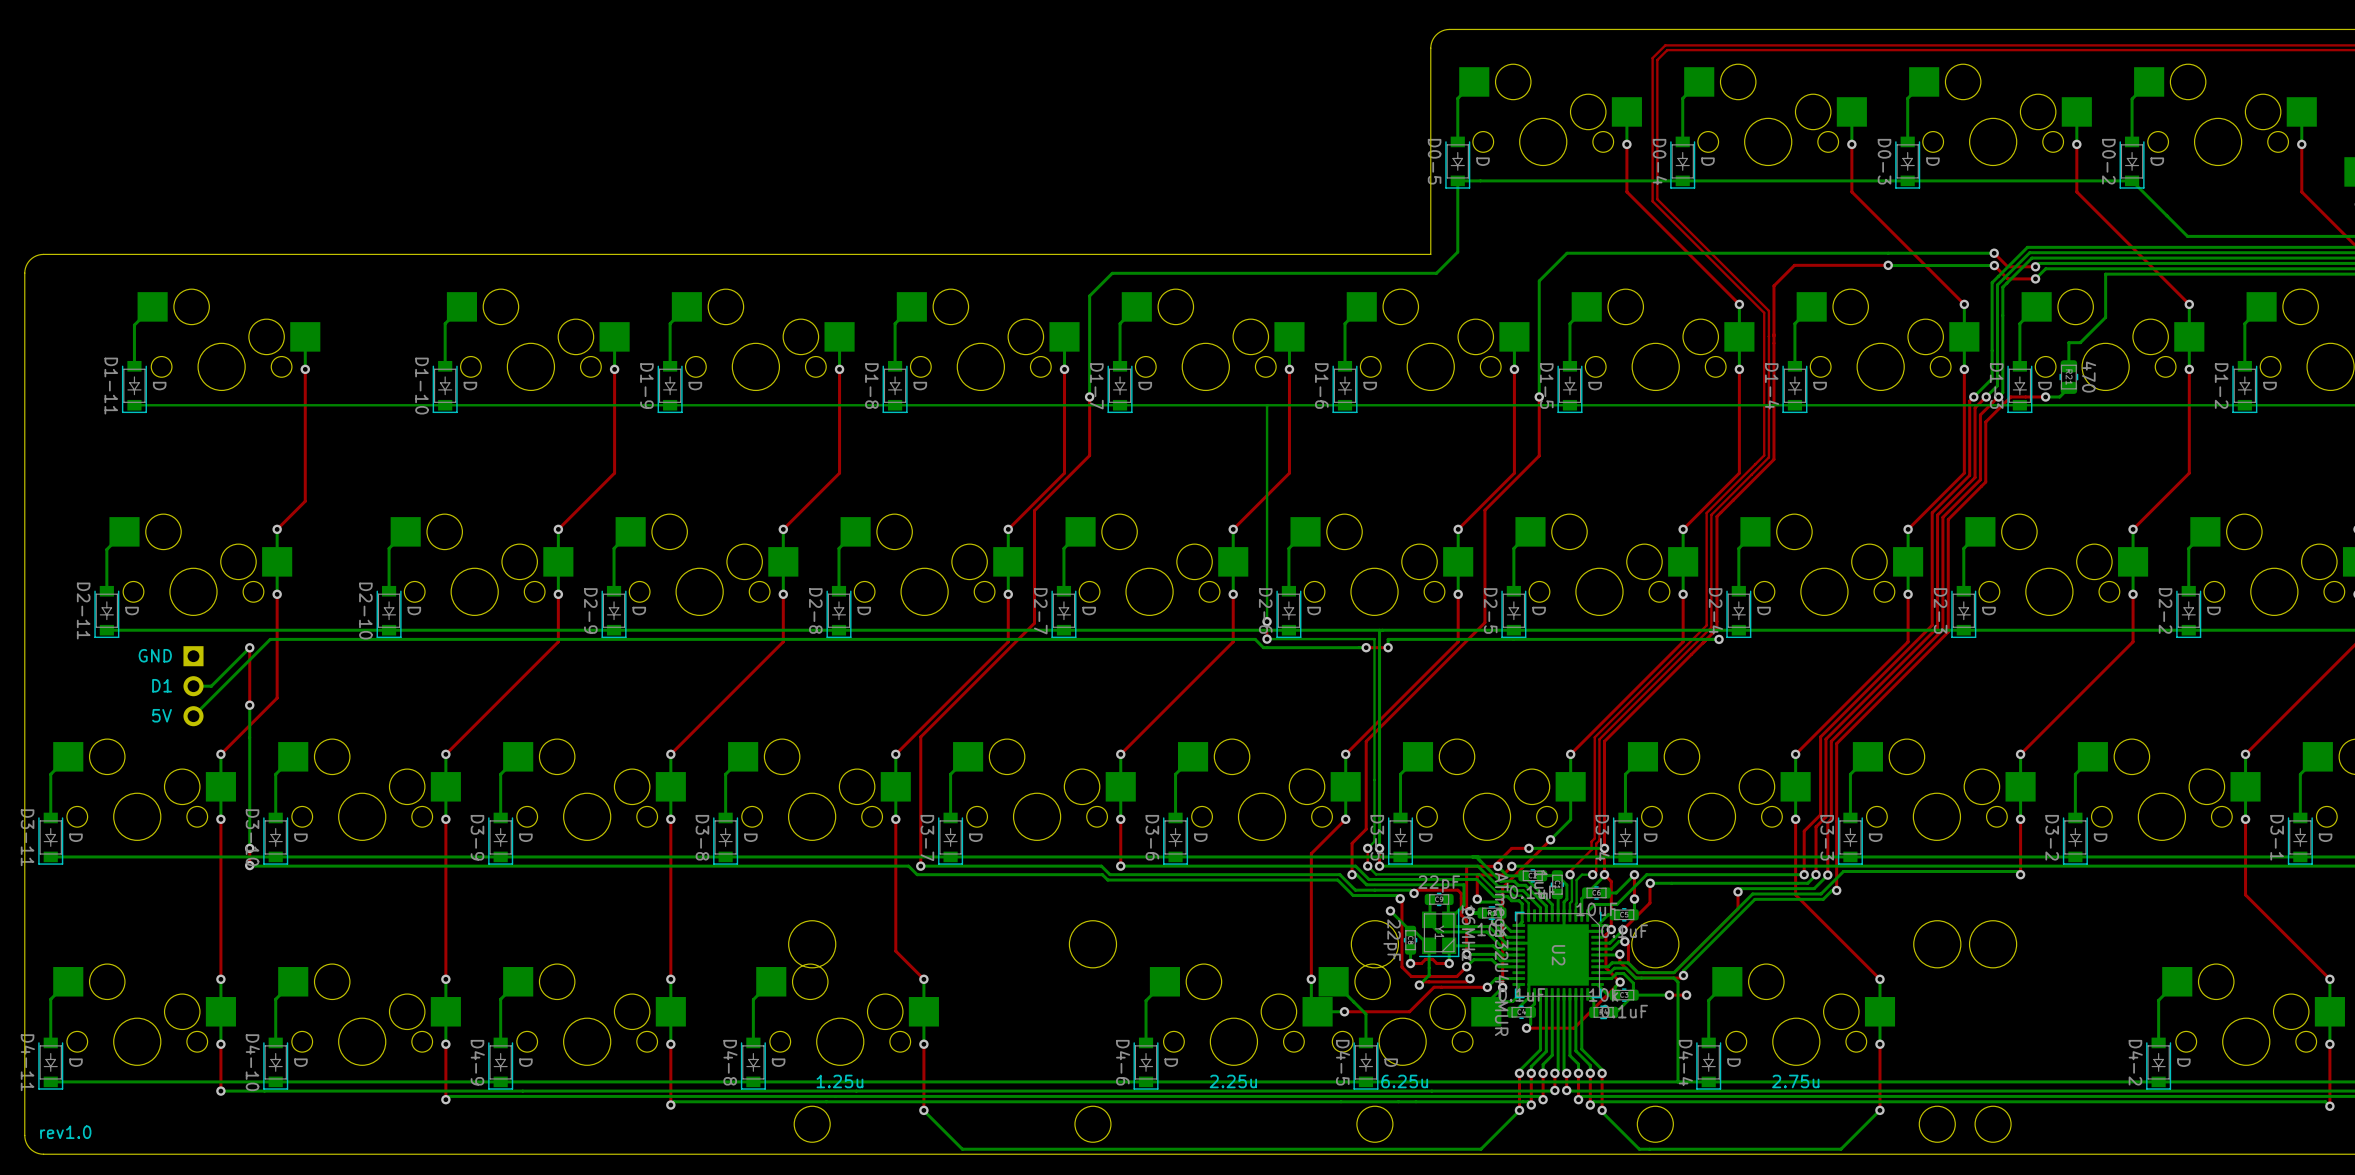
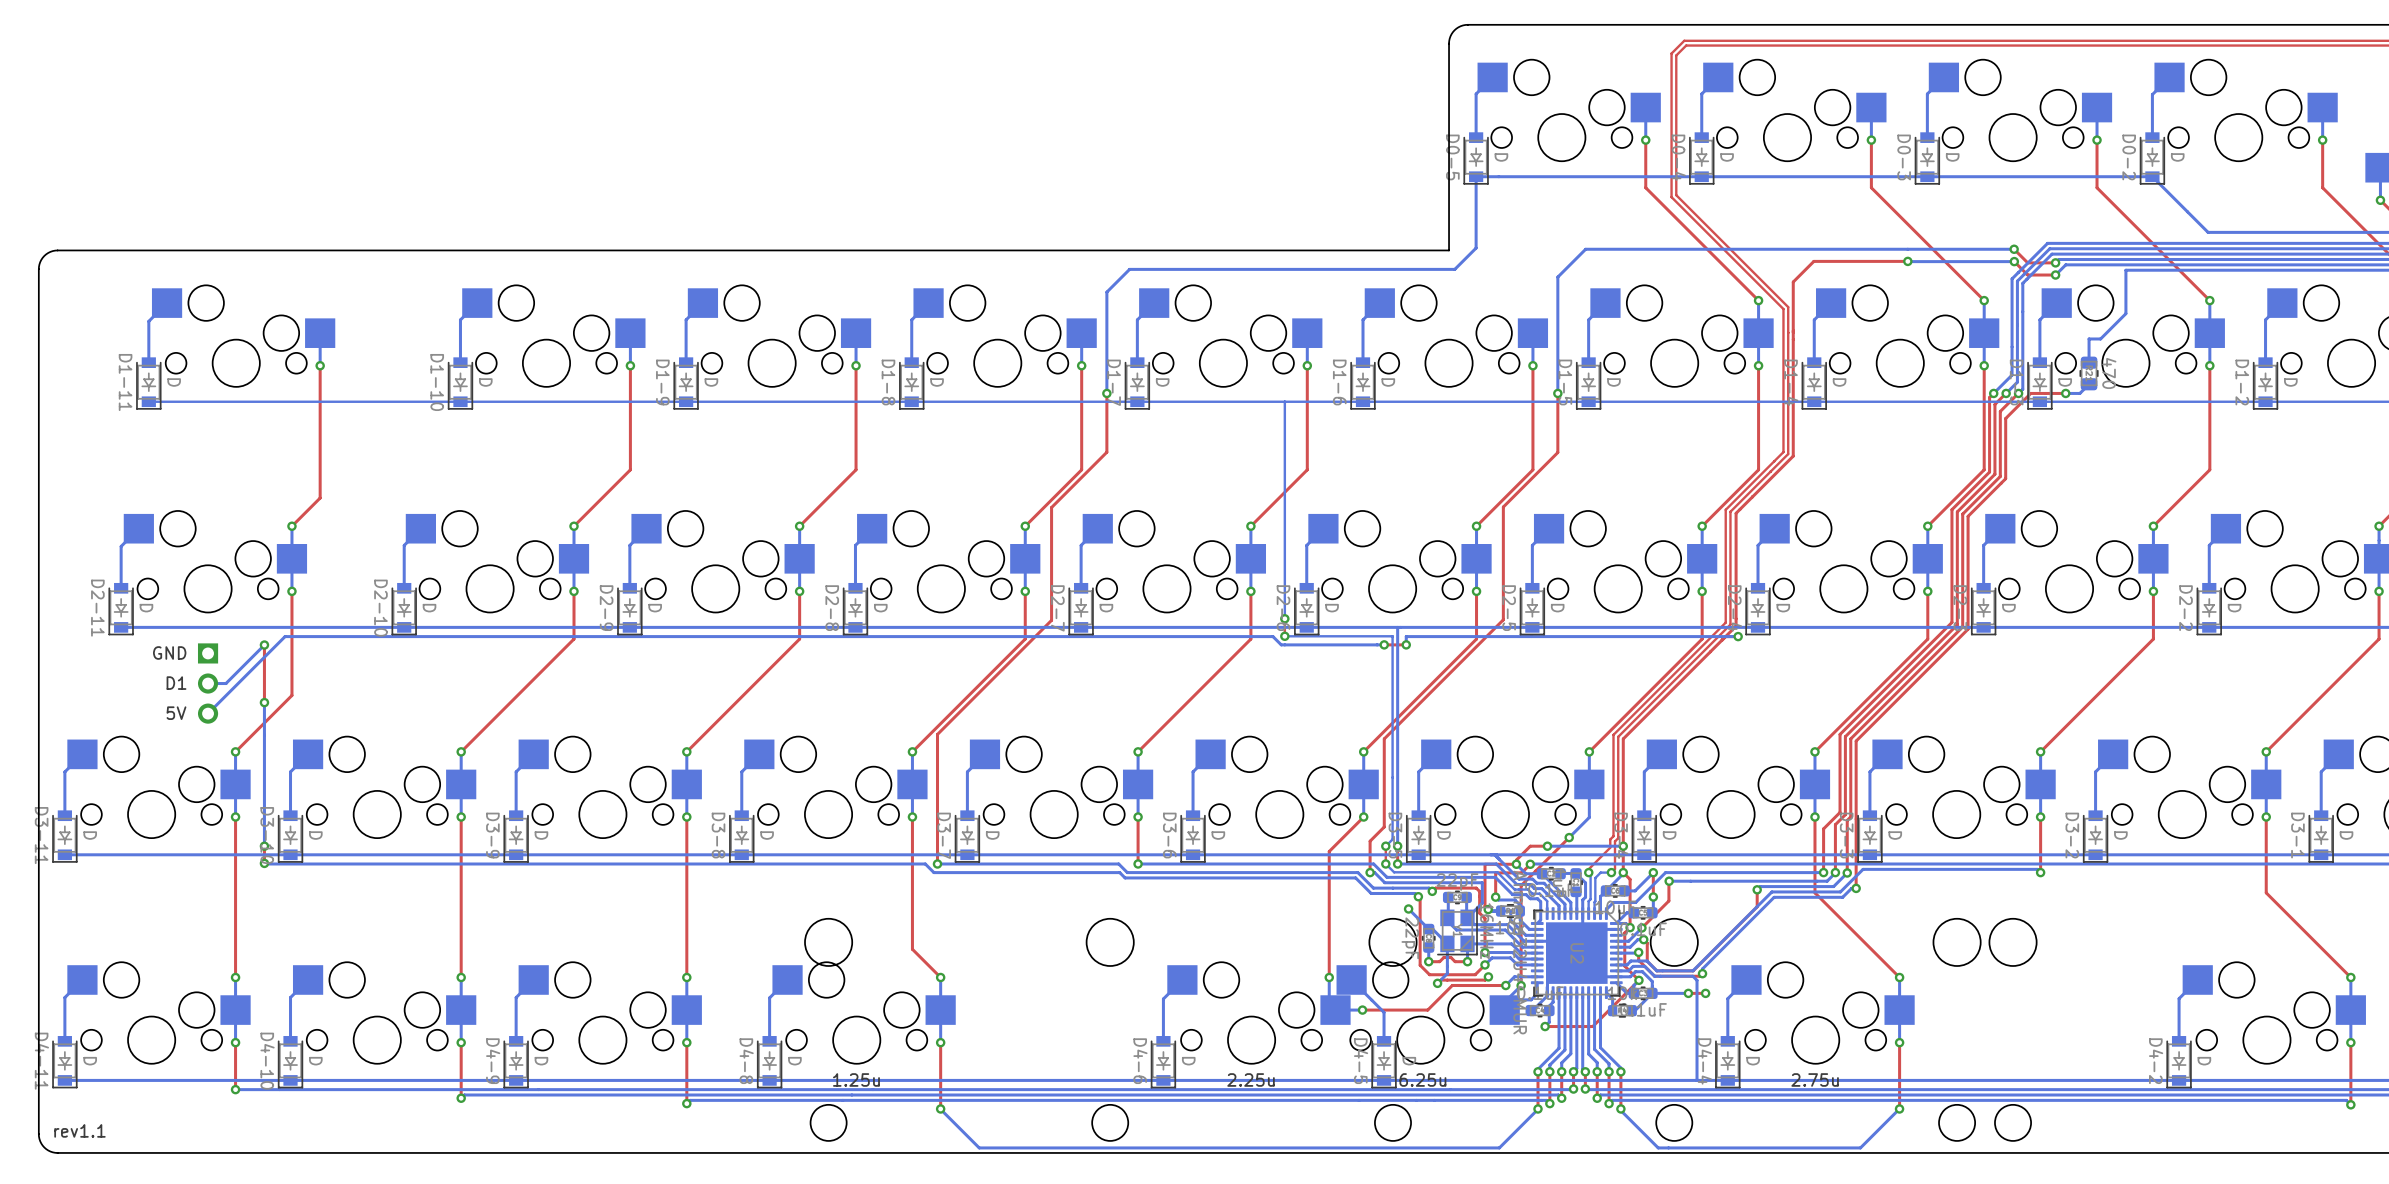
text: rev1.0 (65, 1132) -> rev1.1 (79, 1130)

